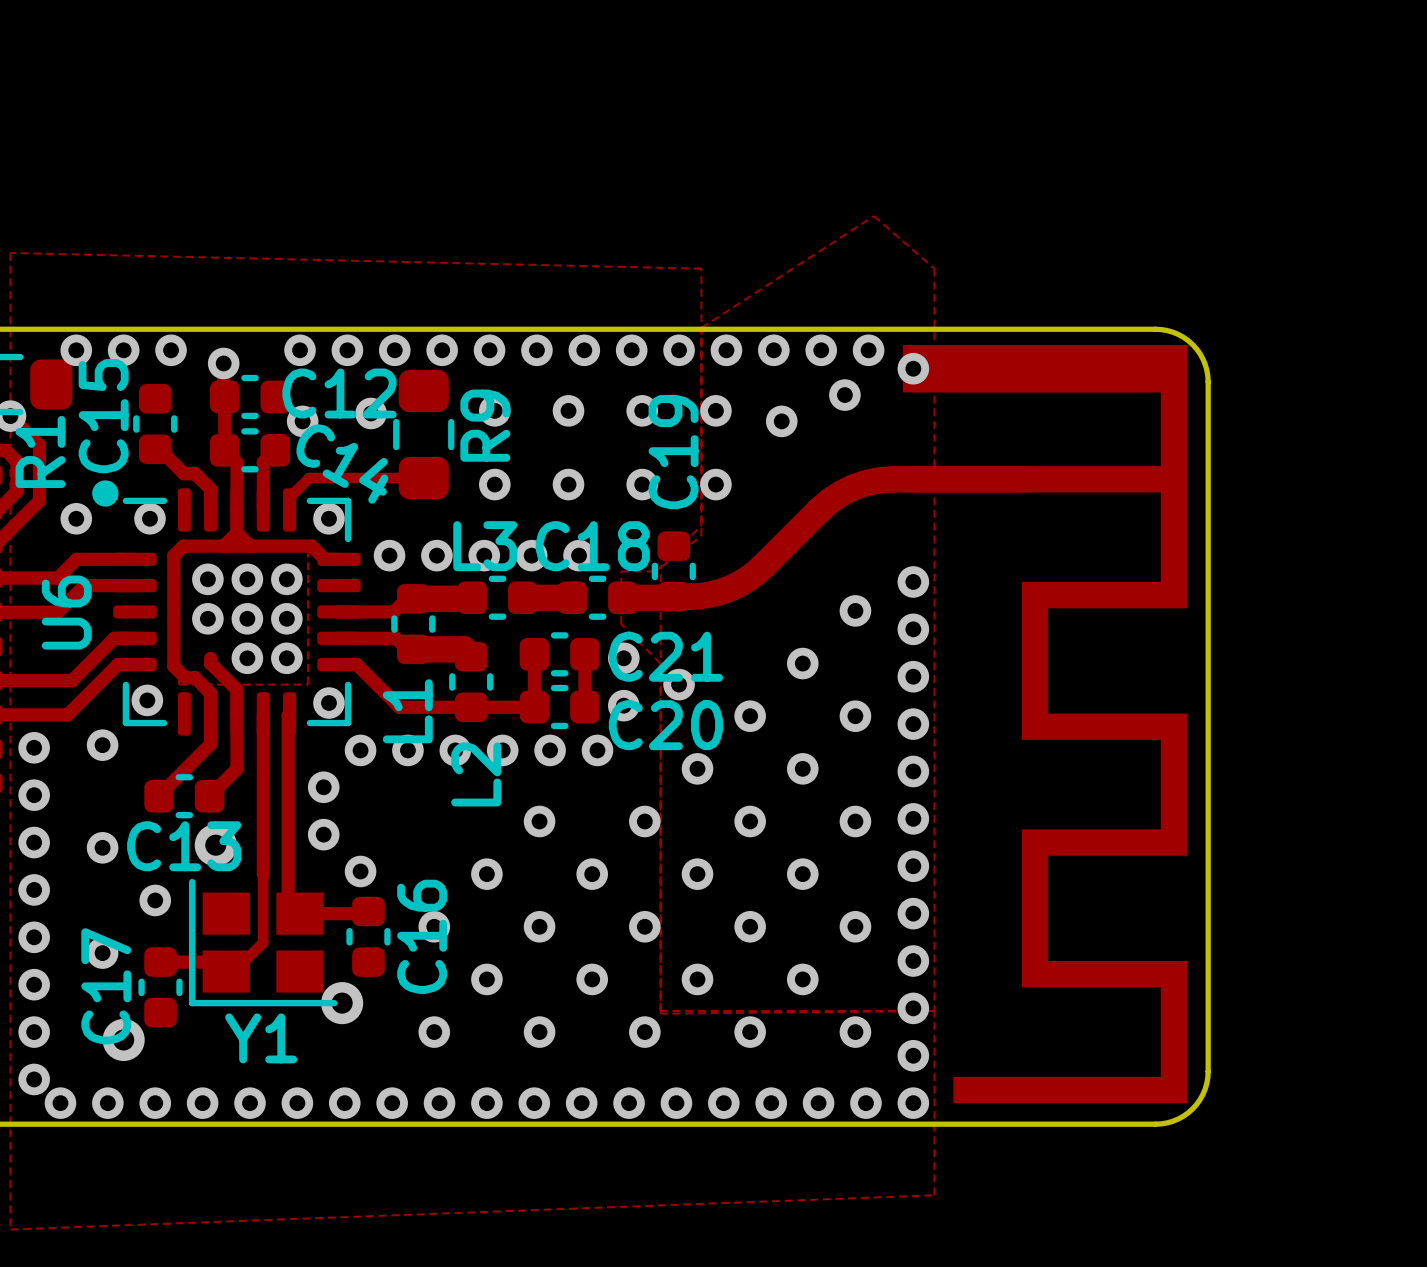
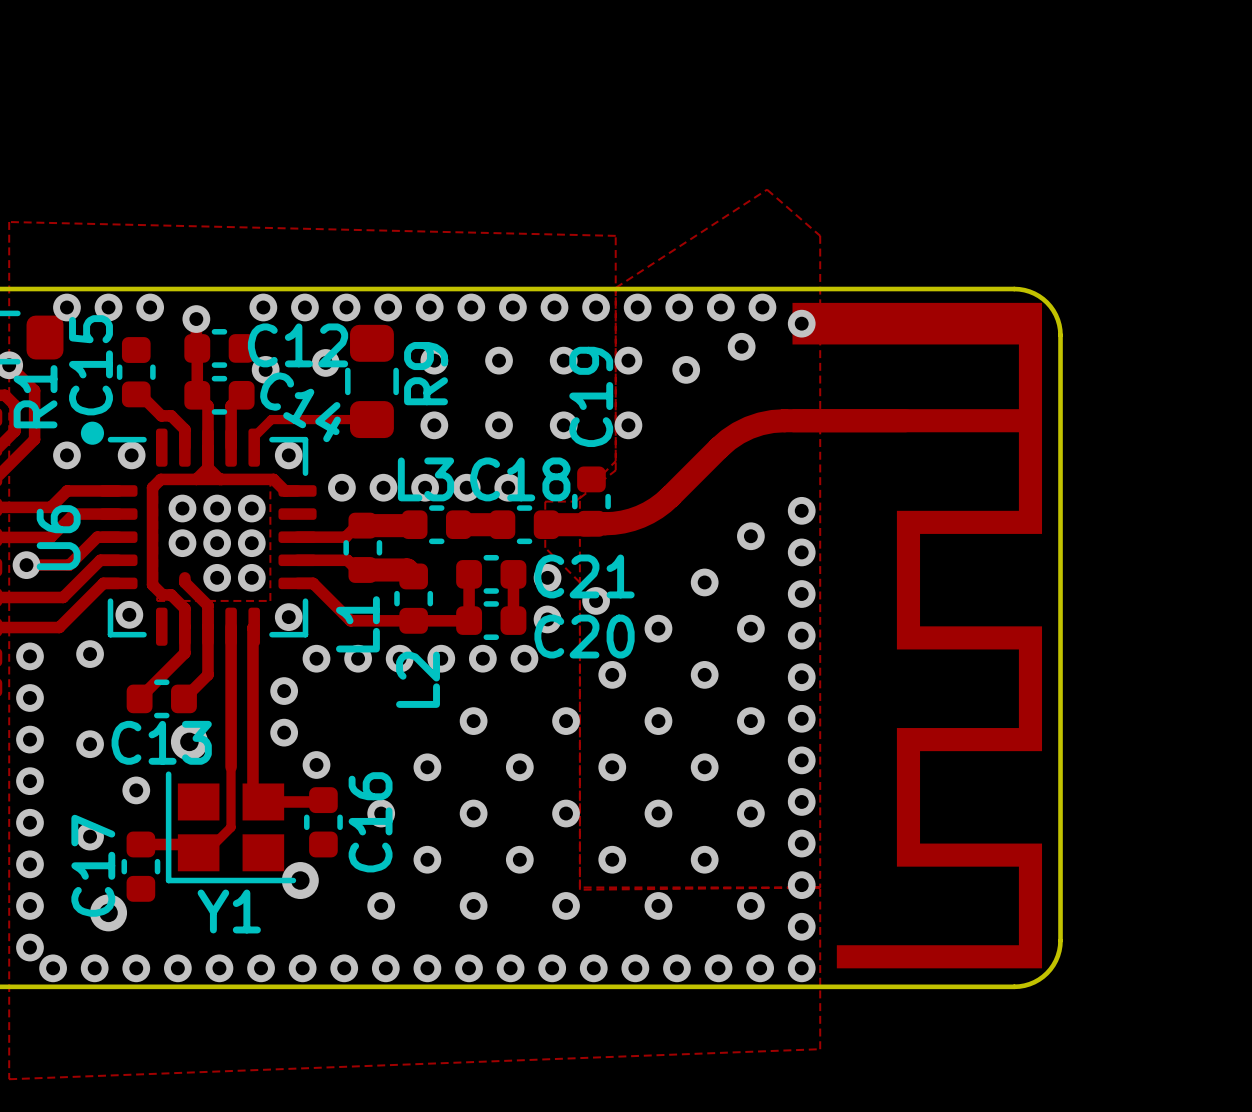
track: none -> (118, 537) (97, 537) (69, 565) (26, 565)
via: none -> (26, 565)

